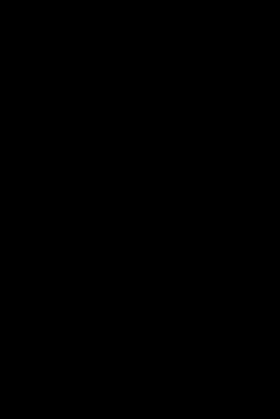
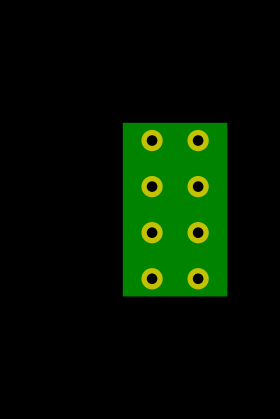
part: none -> (175, 209)

